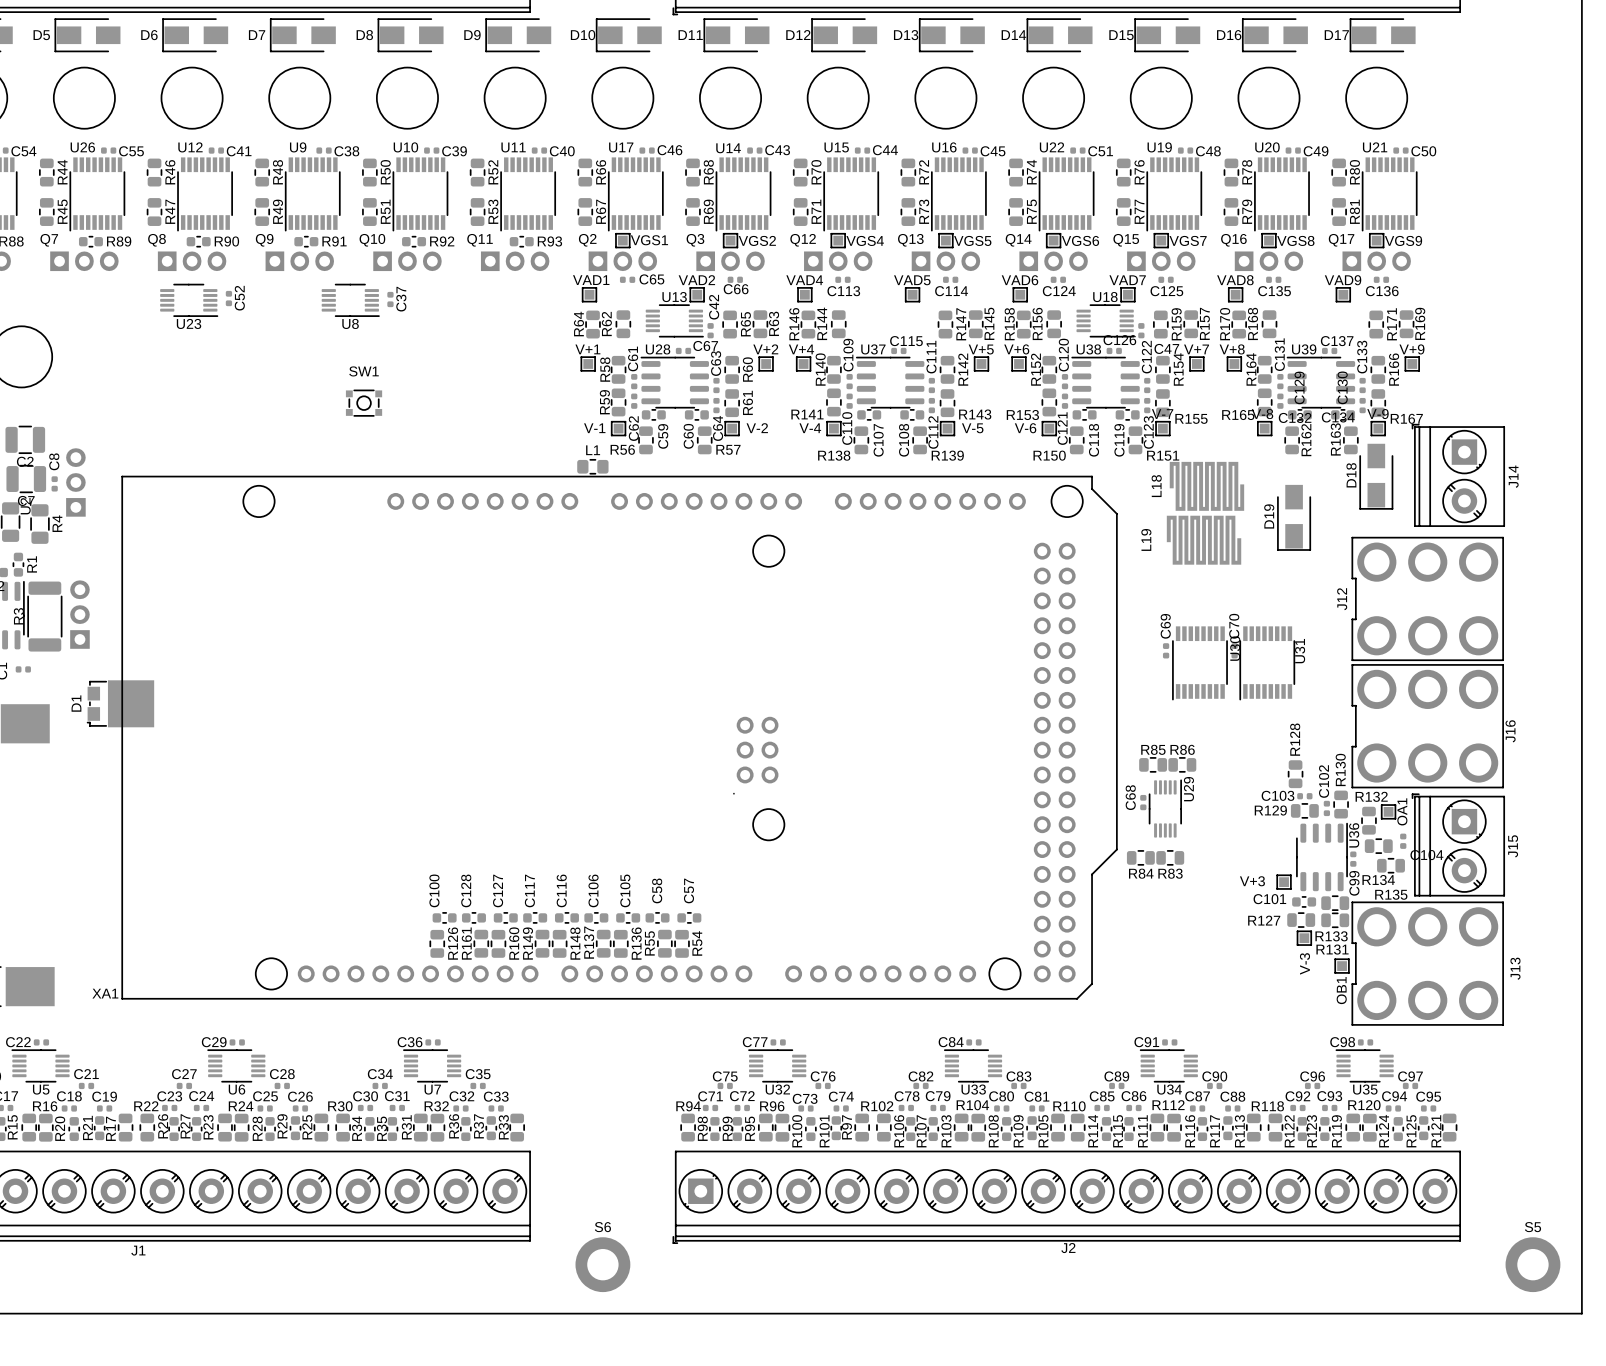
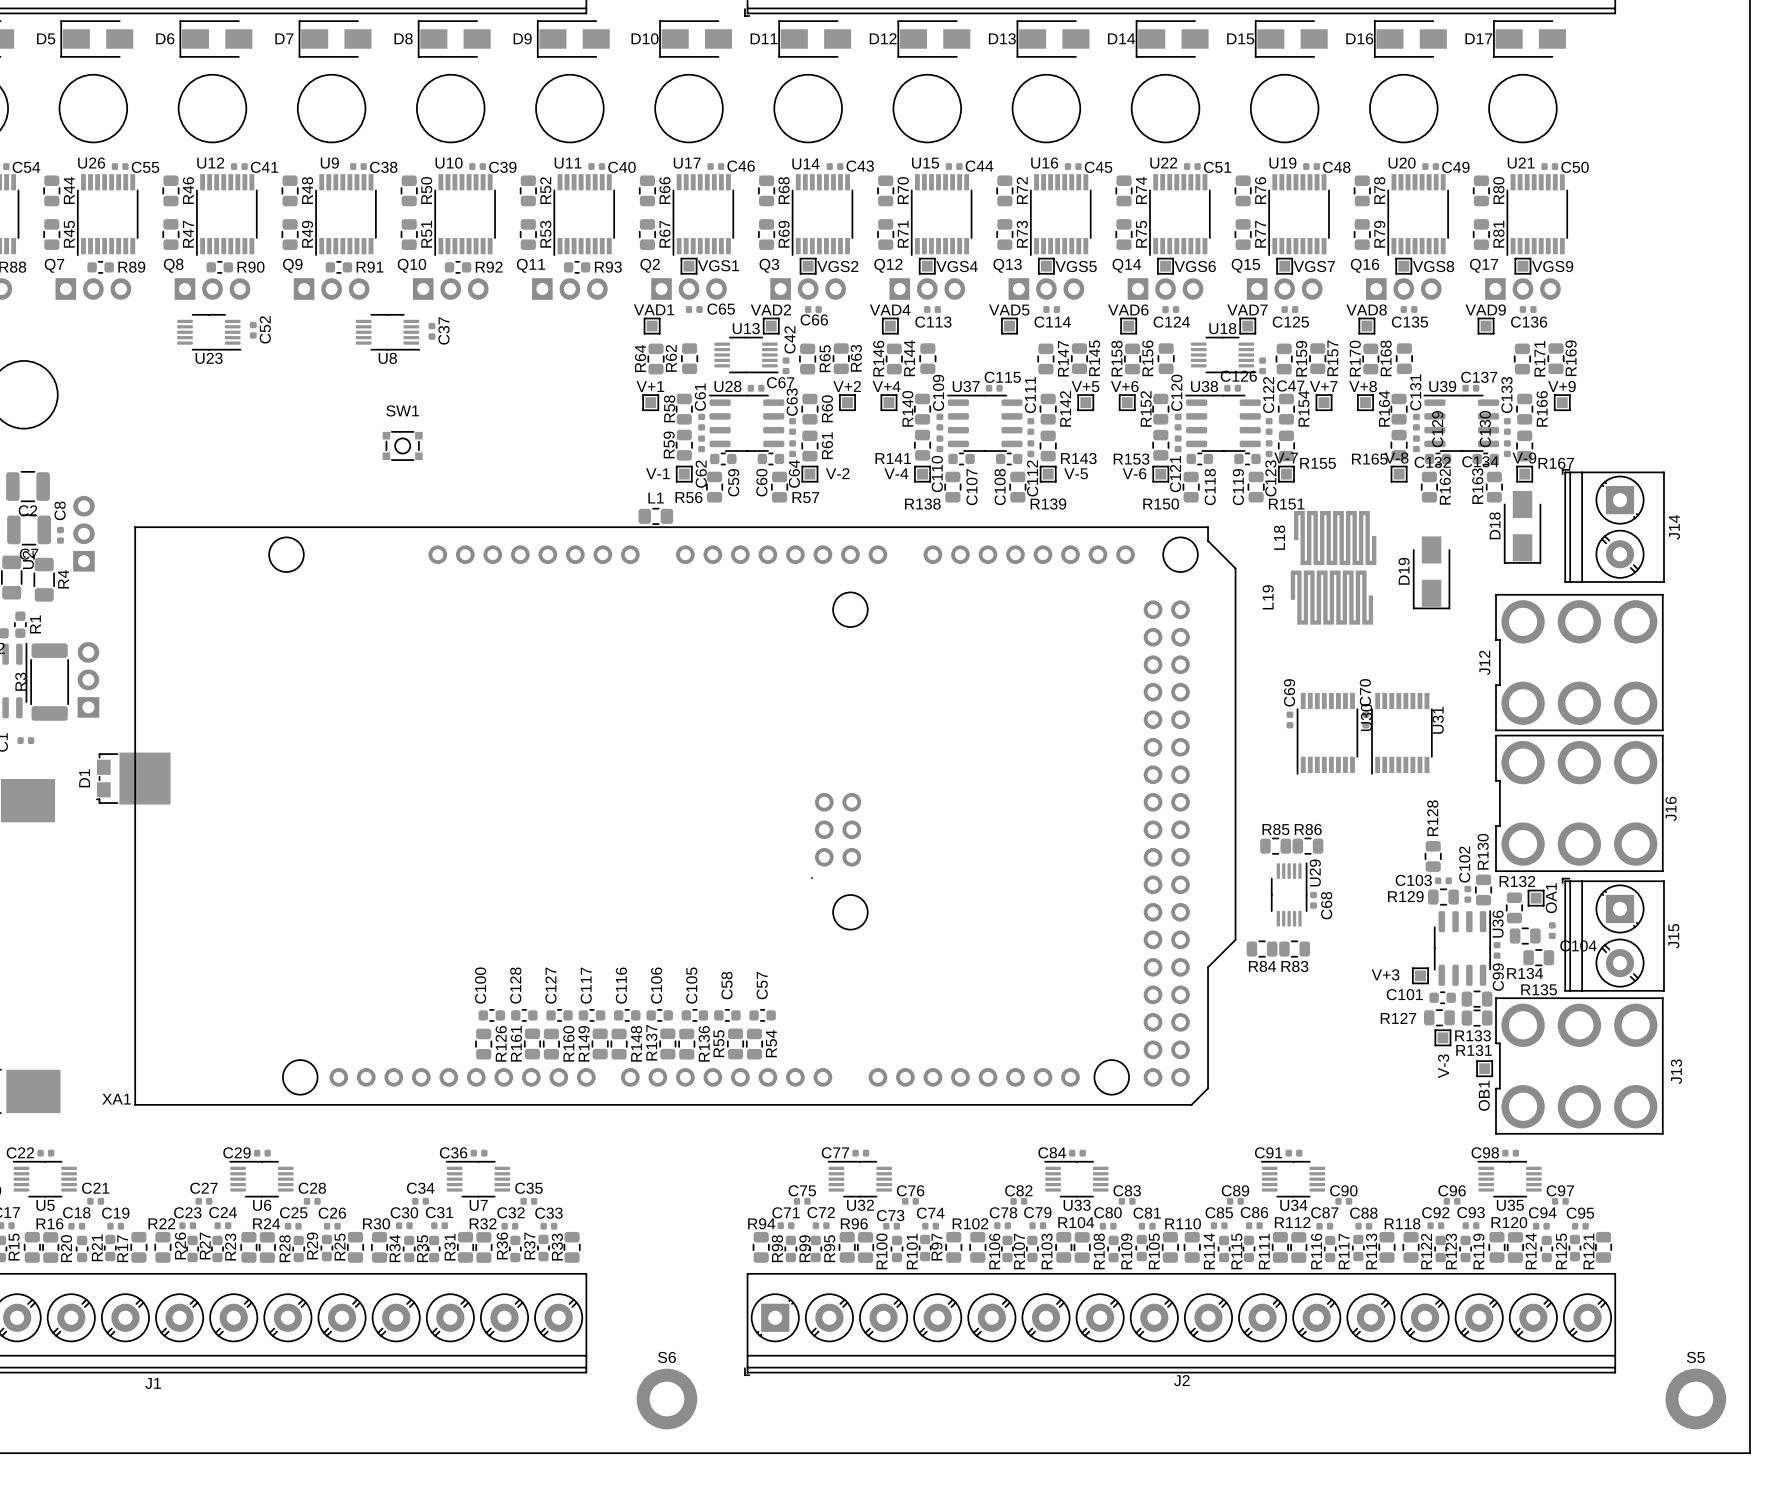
C68 name position: C68 (1130, 797) -> C68 (1326, 905)
C68 position: (1143, 802) -> (1313, 900)

